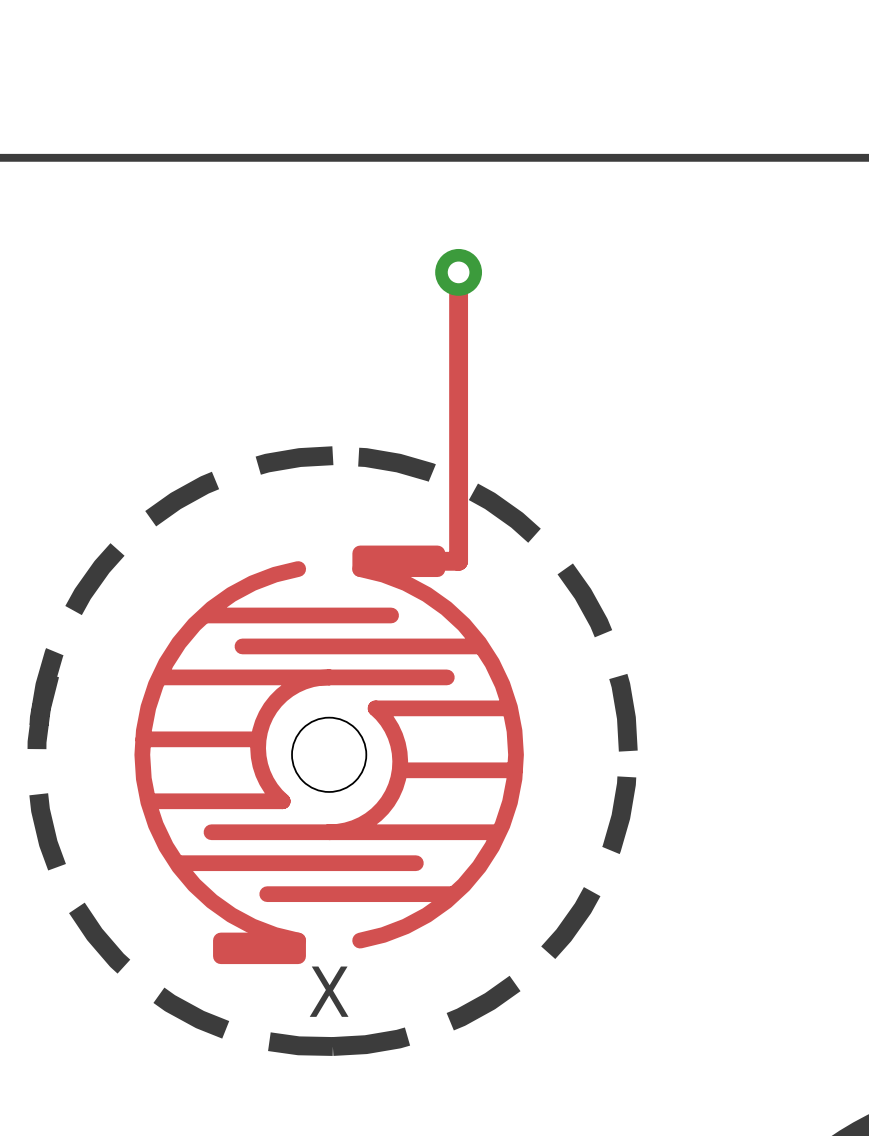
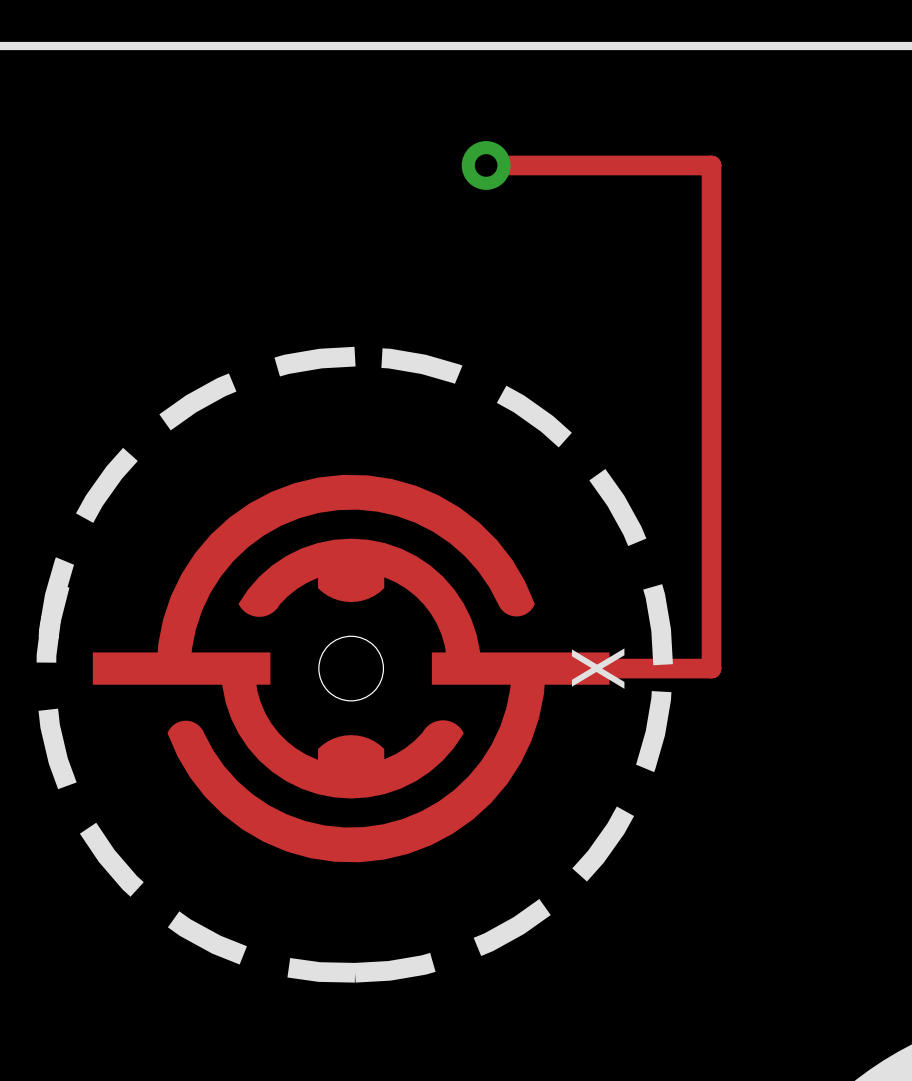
track: (458, 272) (458, 561) (398, 561) -> (486, 165) (711, 165) (711, 668) (520, 668)
X footprint: [134, 545, 524, 965] -> [92, 474, 610, 863]
X name position: X (329, 991) -> X (598, 668)

